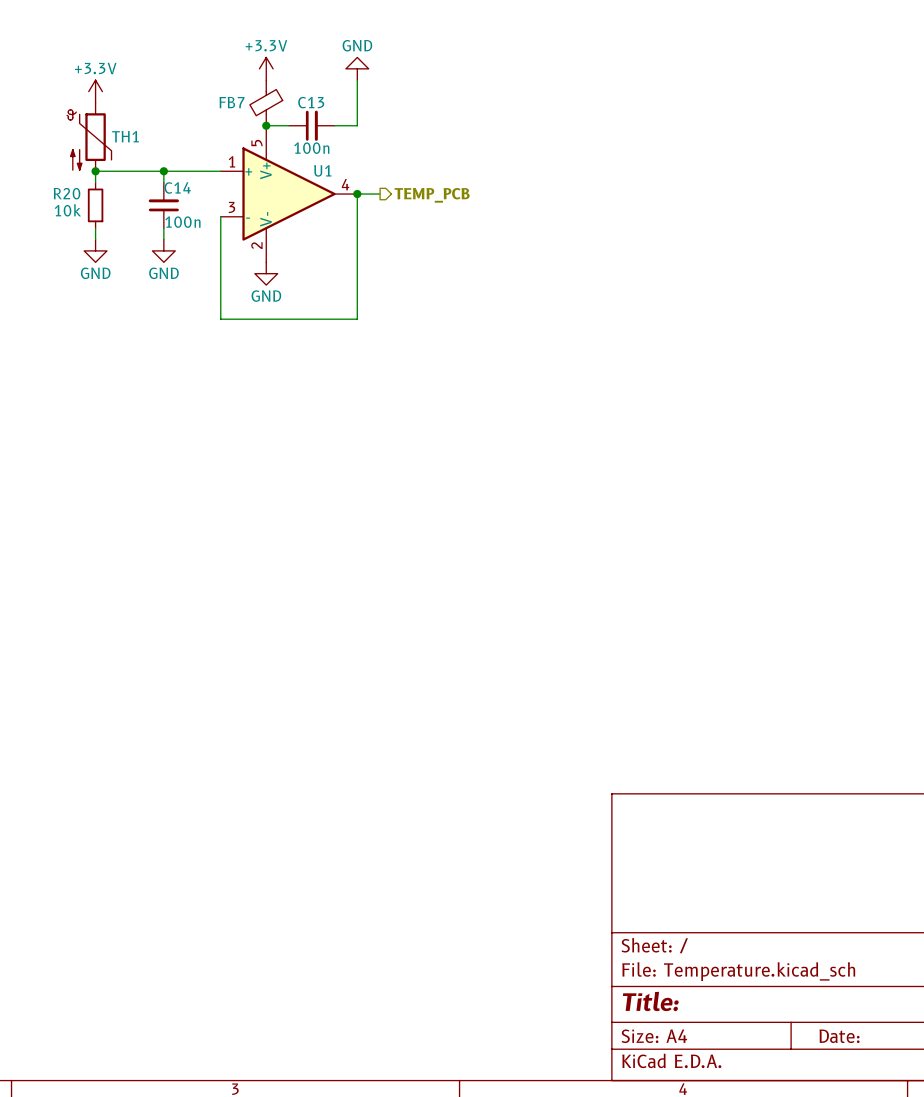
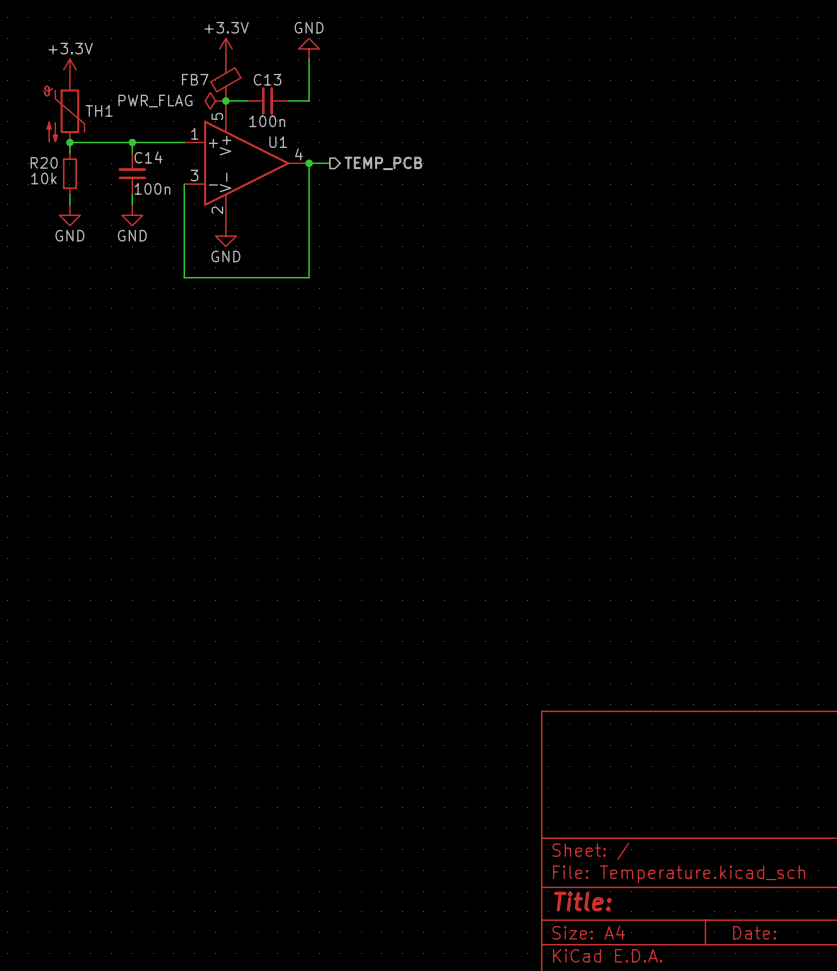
power symbol: none -> PWR_FLAG (215, 100)

